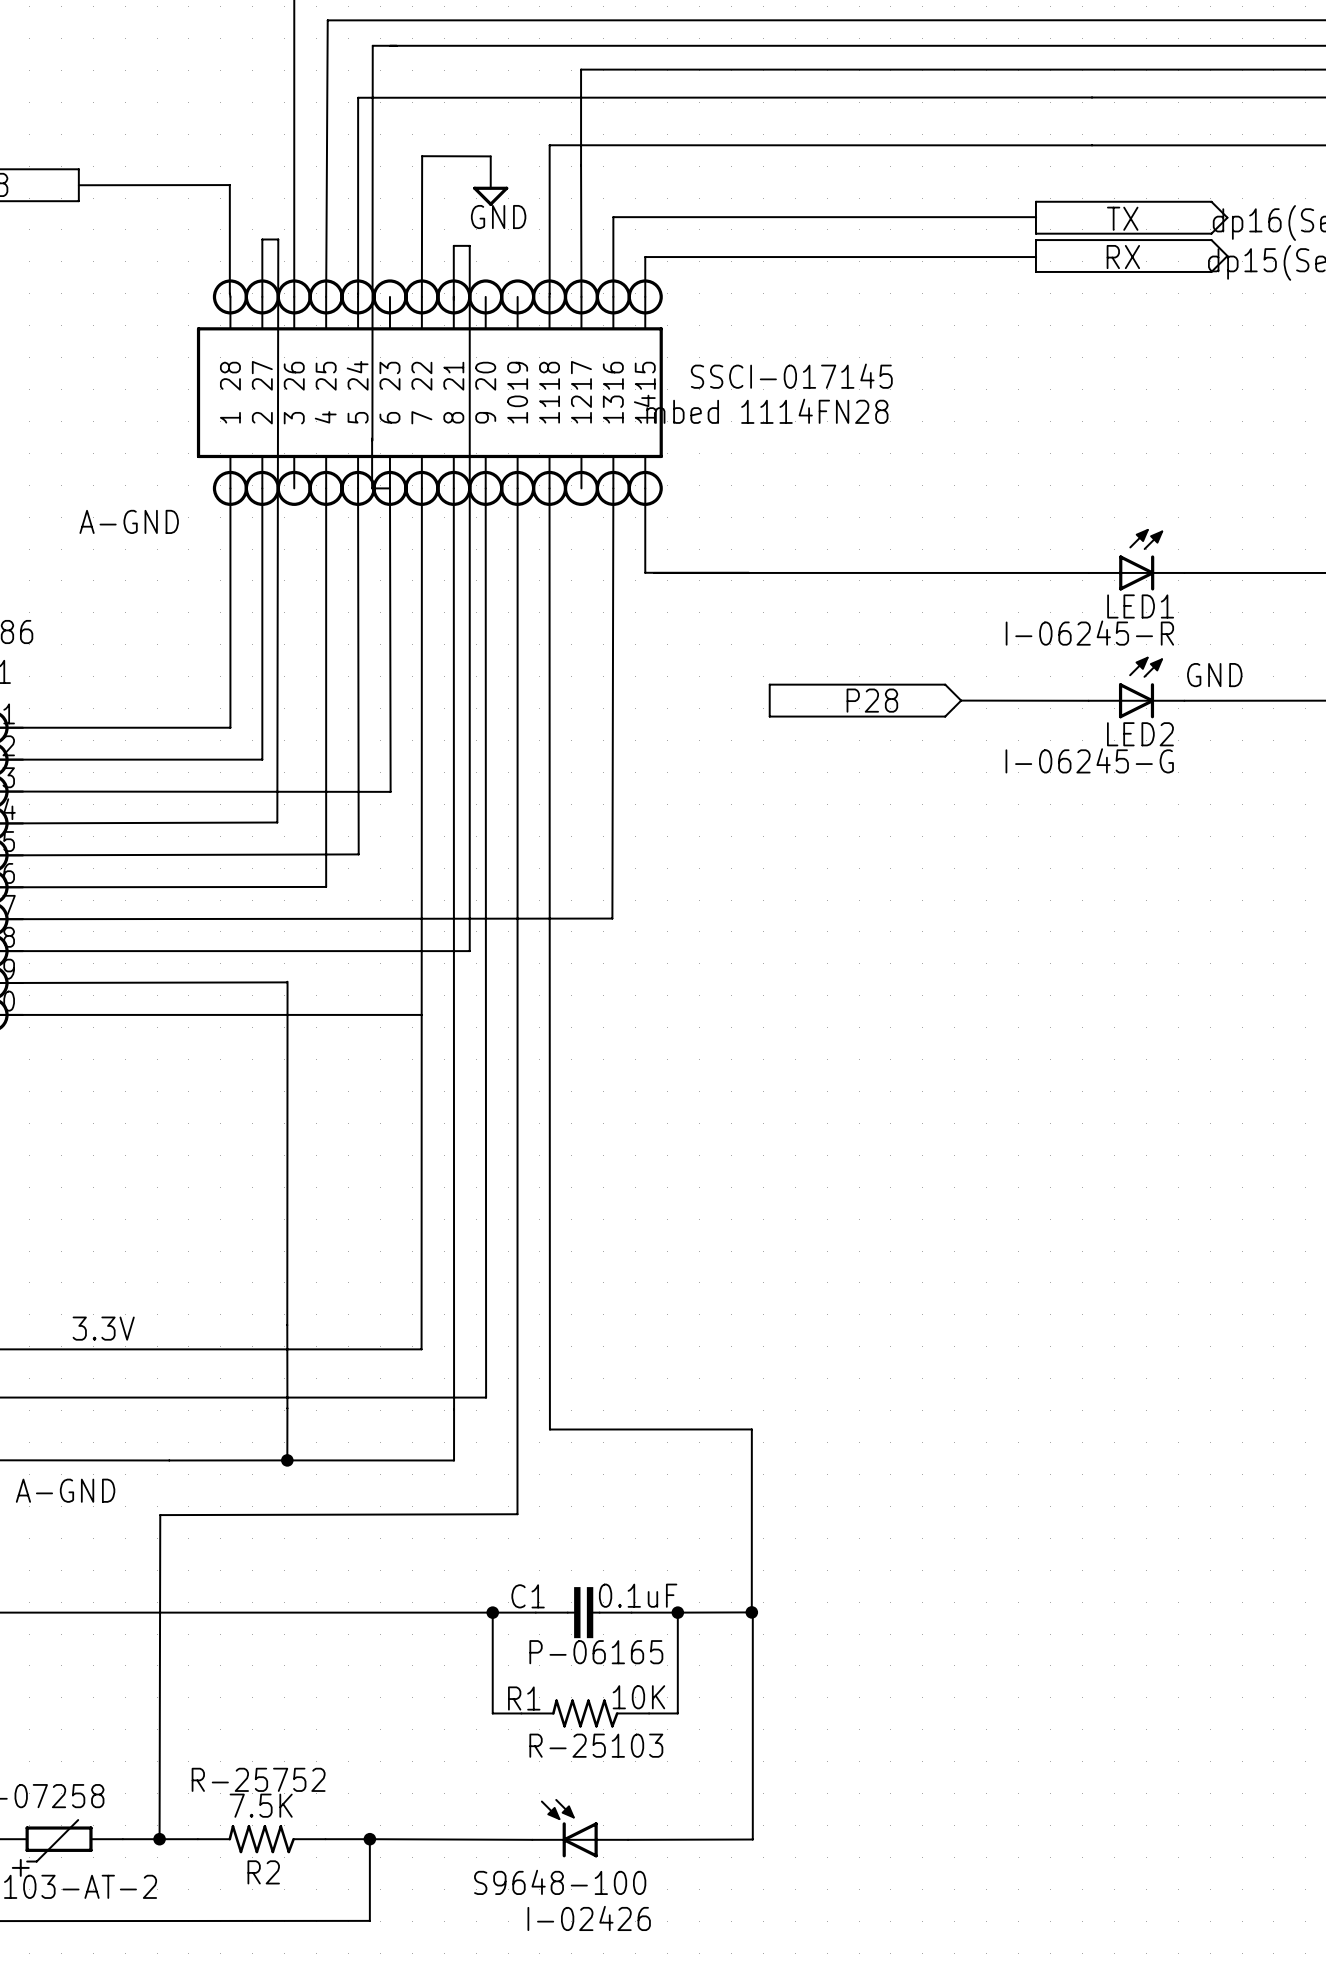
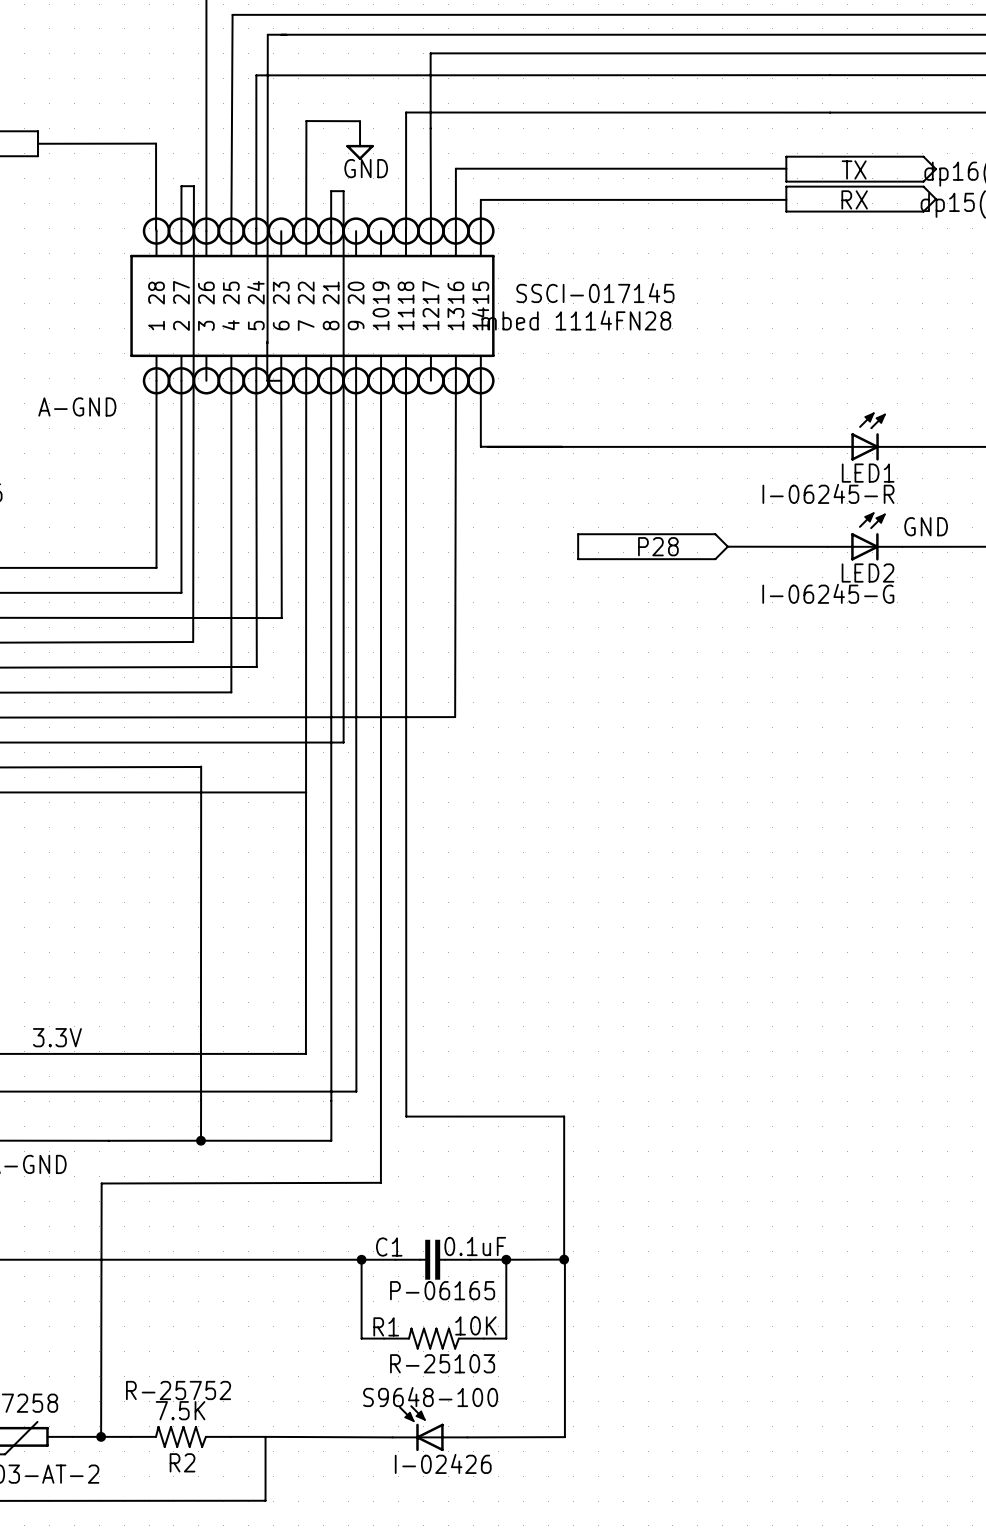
junction: (369, 1839) -> none
part value position: S9648-100 (560, 1882) -> S9648-100 (430, 1397)
text position: I-02426 (589, 1918) -> I-02426 (443, 1463)

